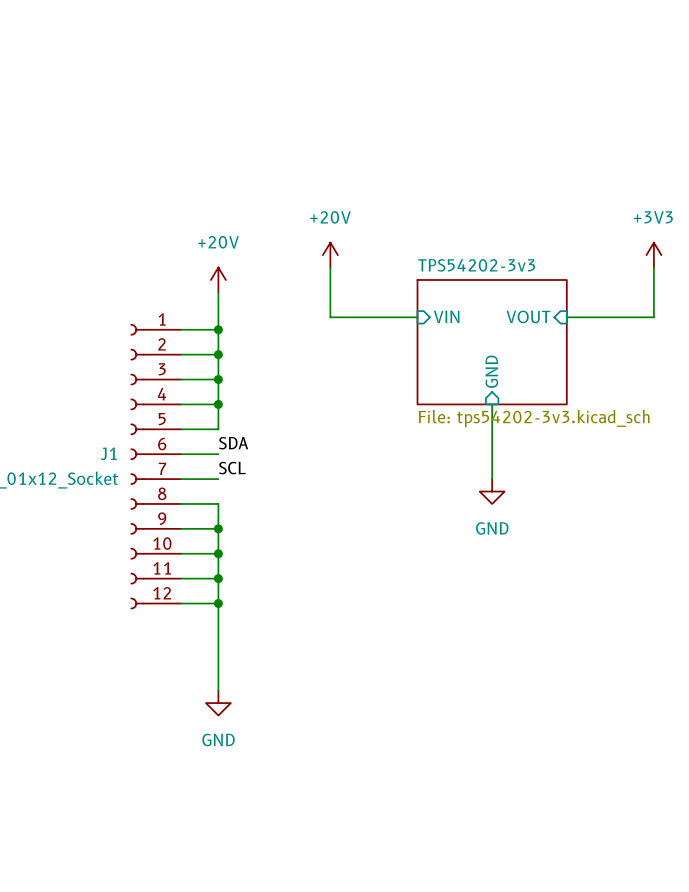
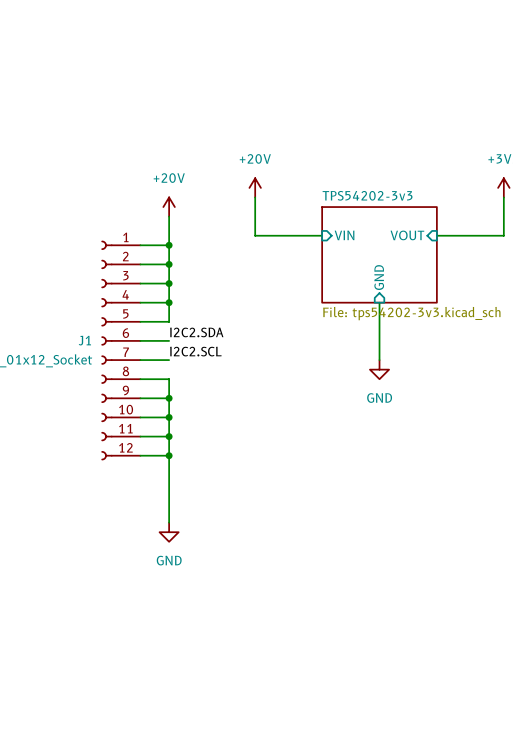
label: SDA (233, 443) -> I2C2.SDA (196, 332)
label: SCL (232, 468) -> I2C2.SCL (195, 351)

